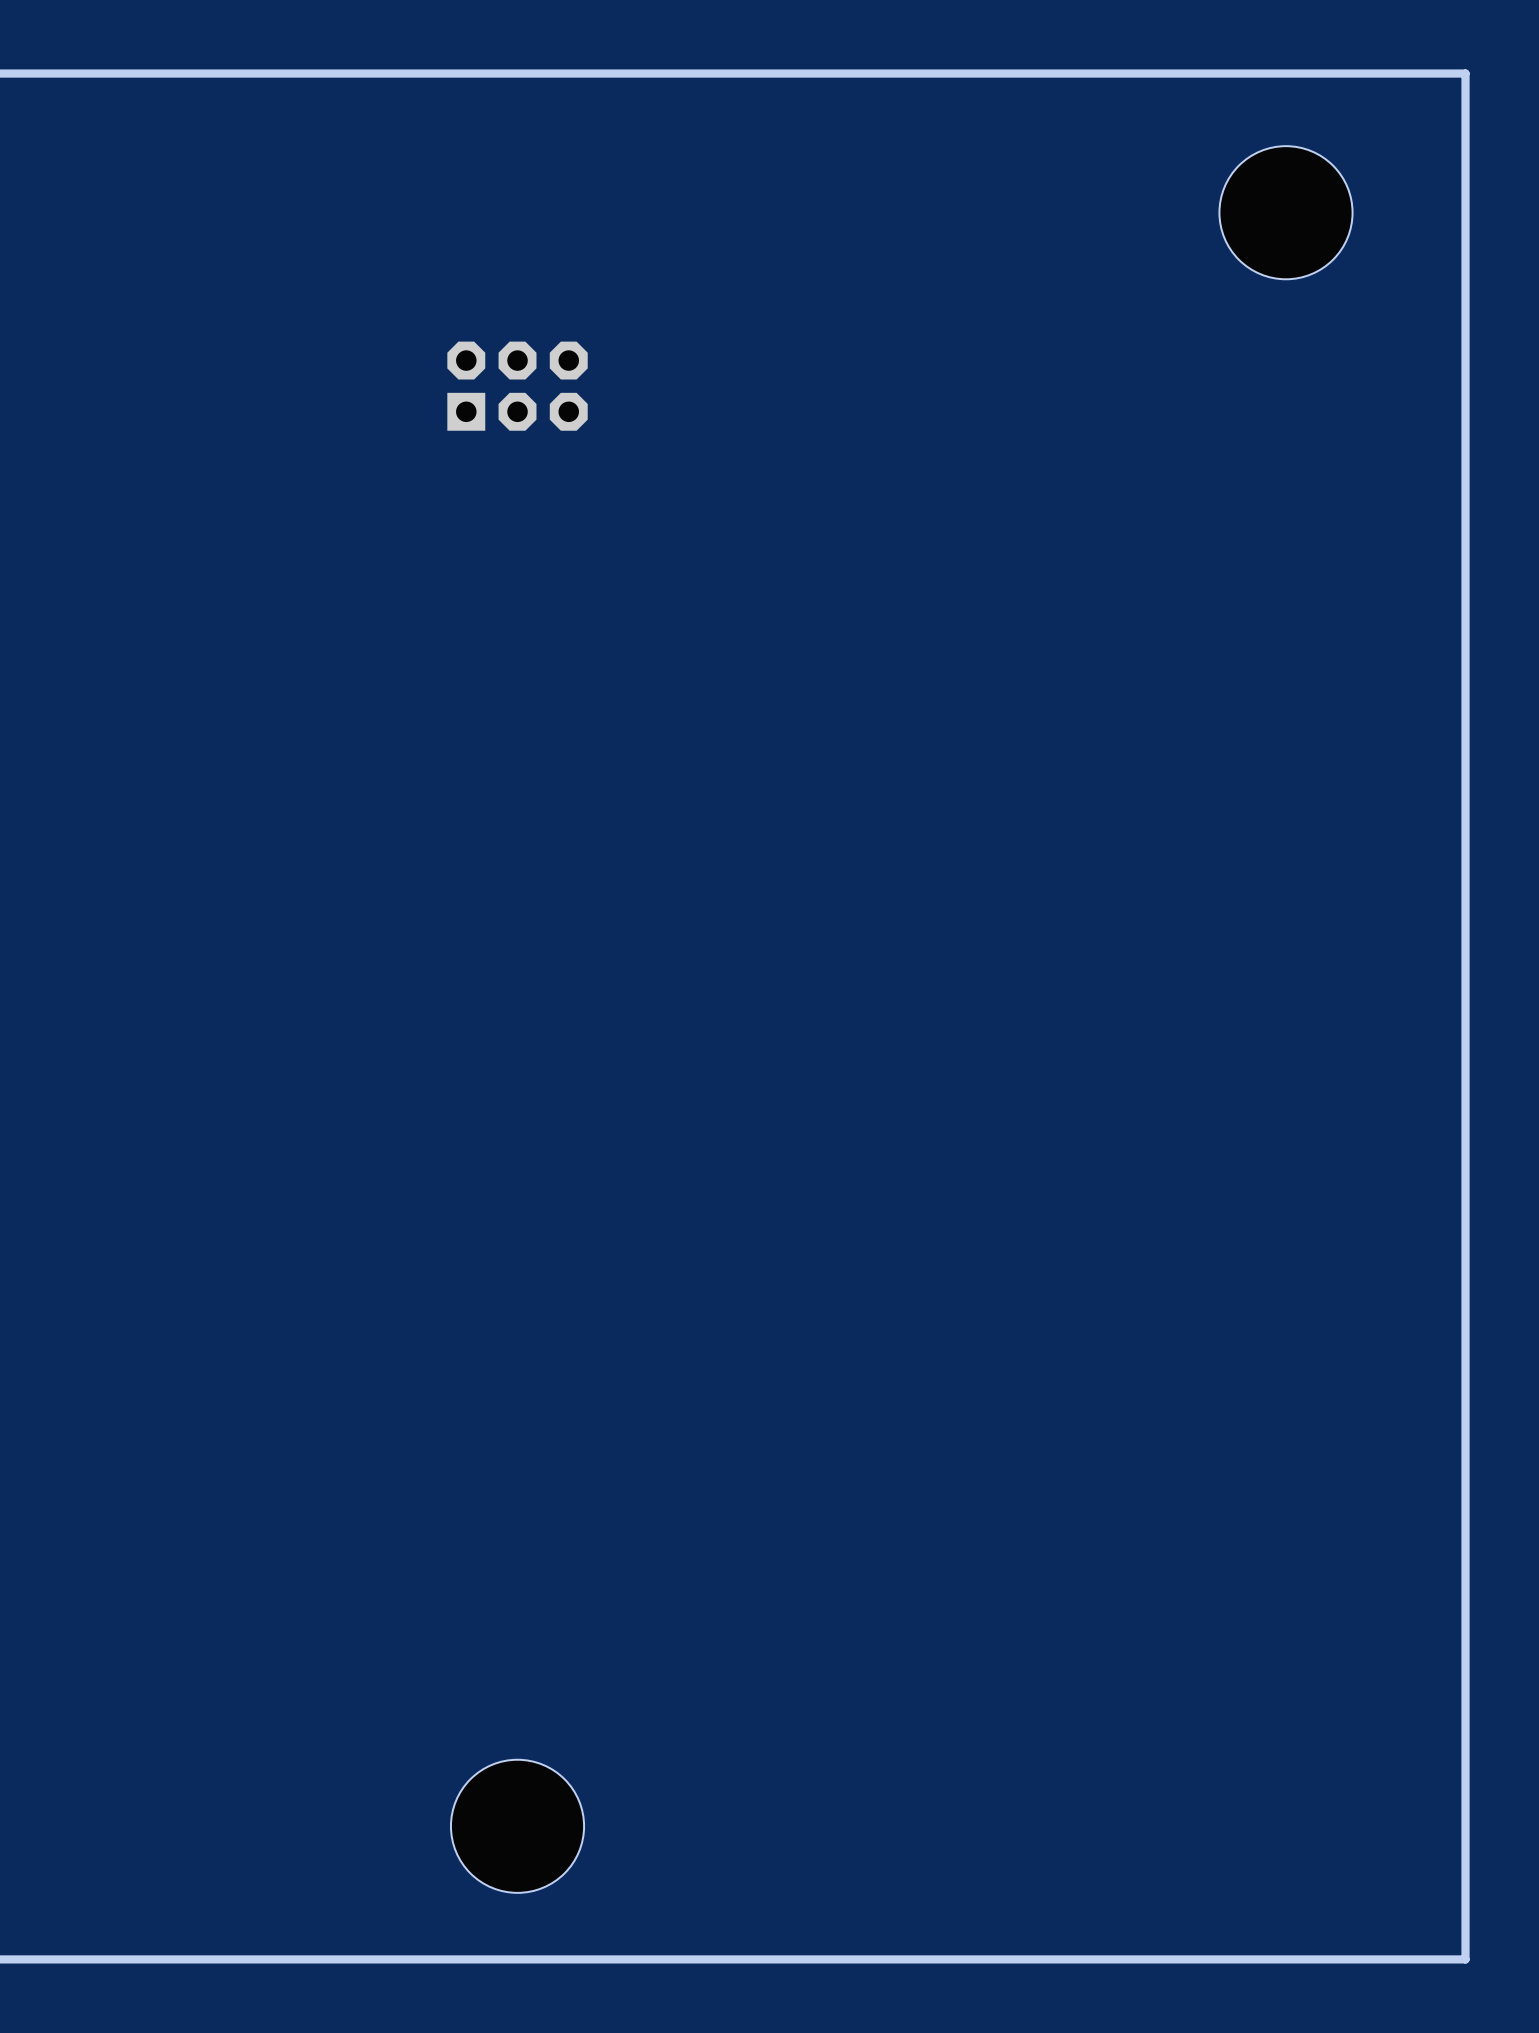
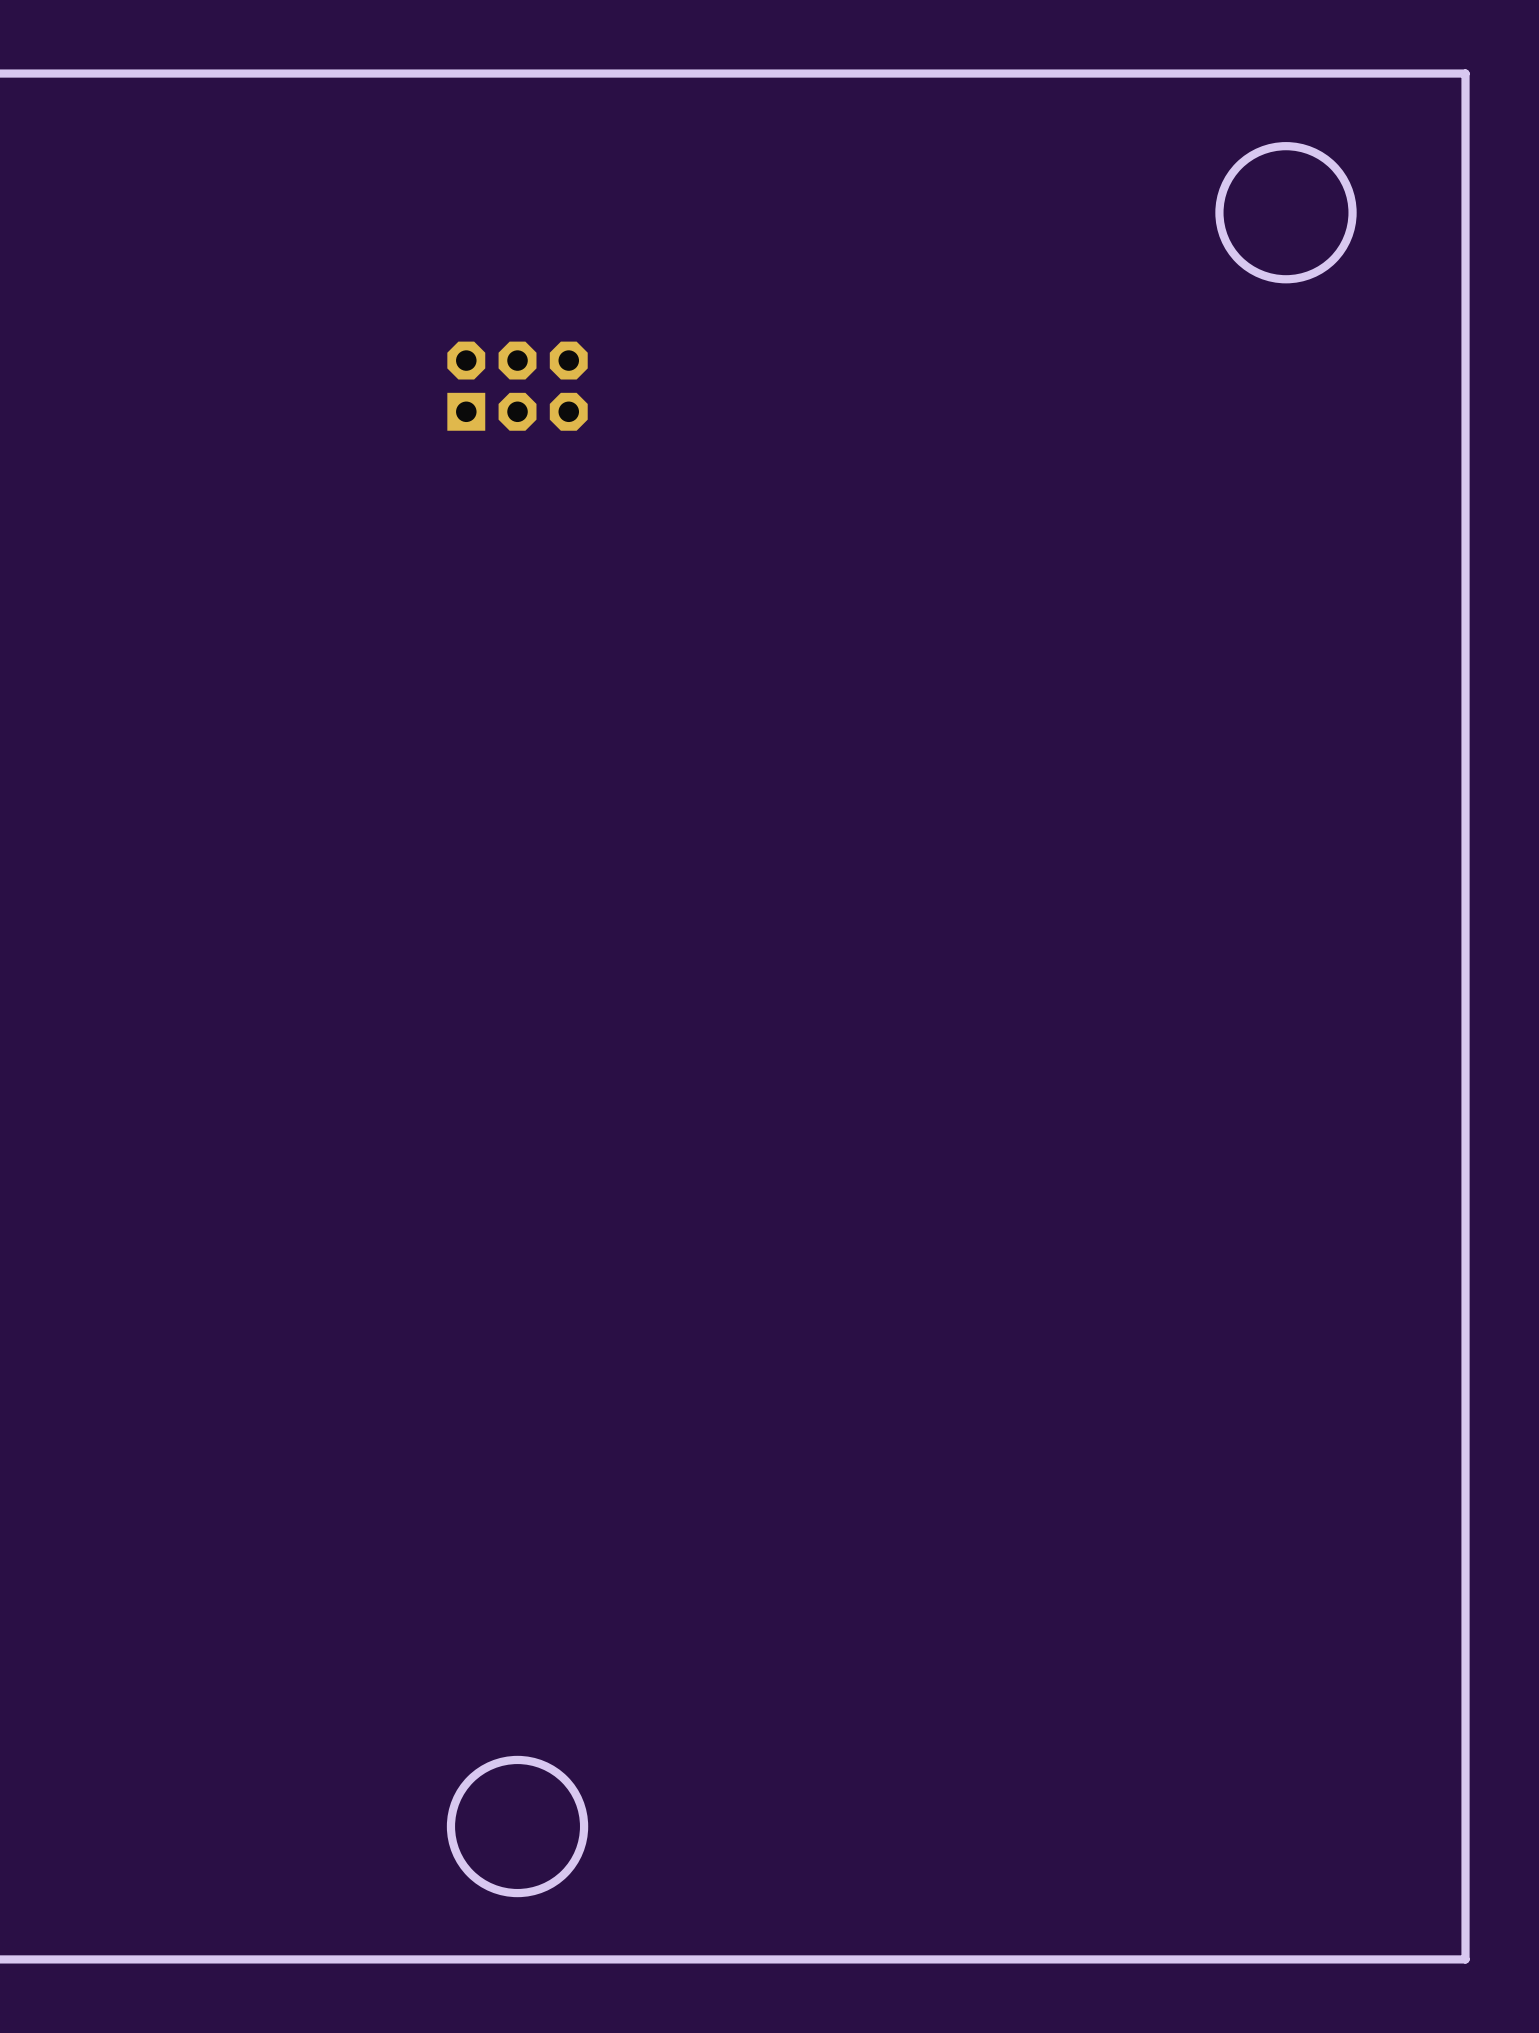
round board edge: none -> [1215, 142, 1357, 284]
hole: (1286, 212) -> none
round board edge: none -> [446, 1755, 589, 1898]
hole: (517, 1826) -> none

